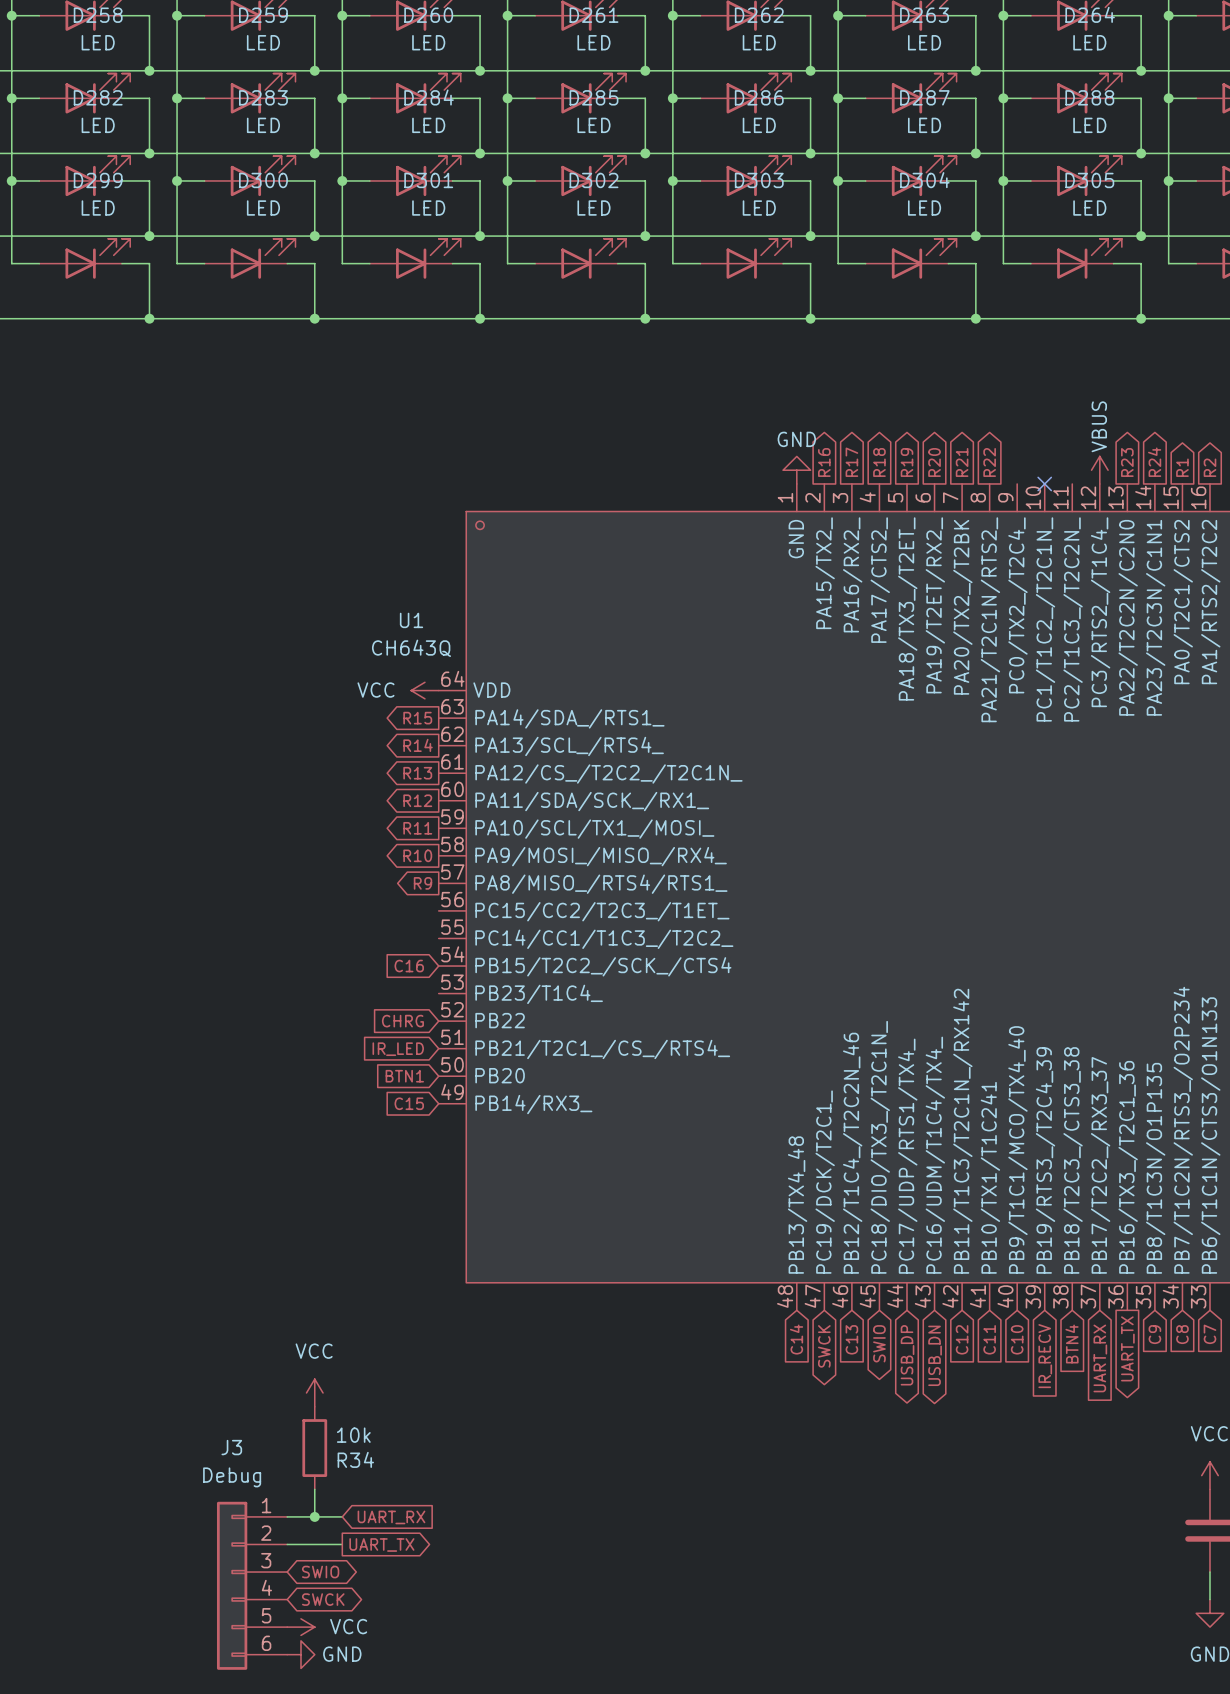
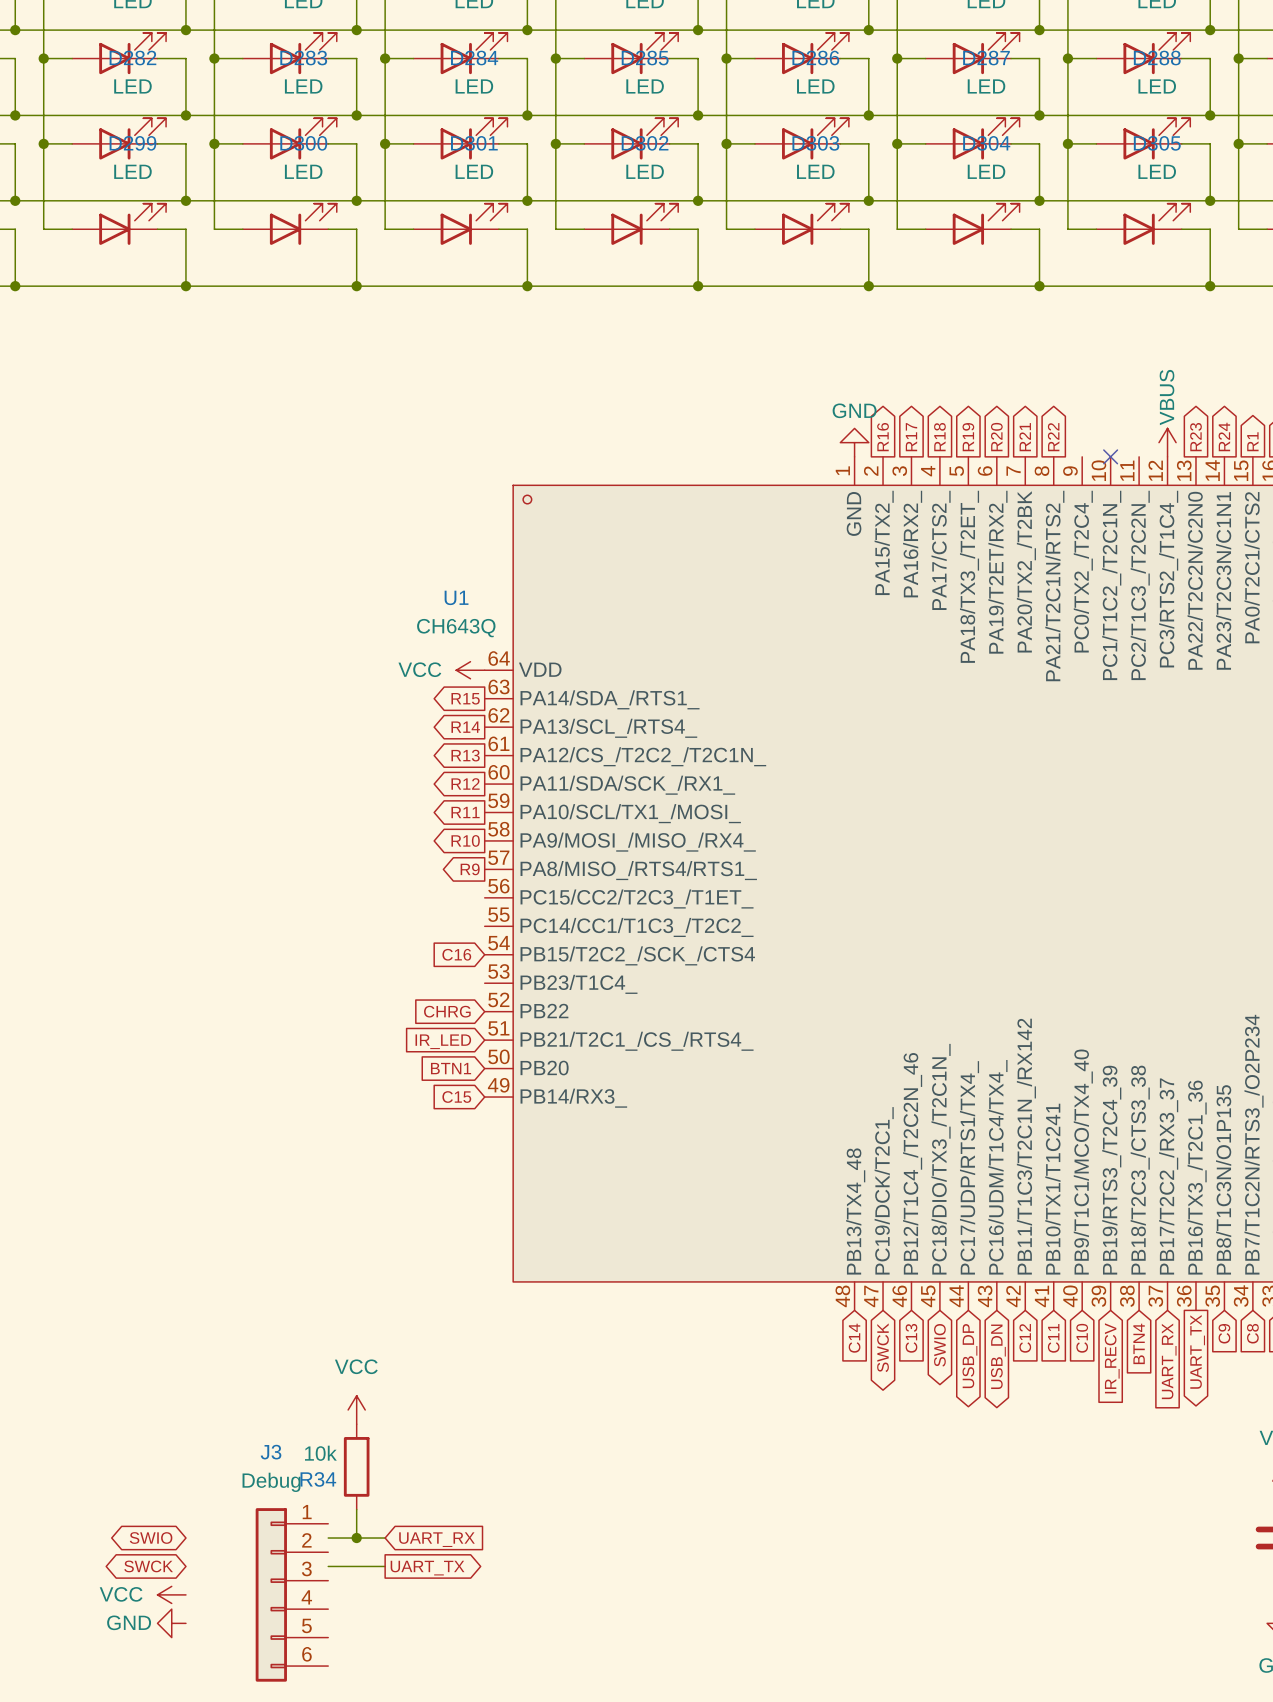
power symbol position: VCC (314, 1392) -> VCC (356, 1409)
R34 value position: 10k (353, 1435) -> 10k (320, 1453)
R34 position: (314, 1448) -> (356, 1466)
R34 name position: R34 (355, 1459) -> R34 (318, 1479)
wire: (287, 1516) (342, 1516) -> (328, 1538) (385, 1538)
junction position: (314, 1516) -> (356, 1538)
global label position: UART_RX (391, 1517) -> UART_RX (437, 1539)
wire: (287, 1544) (342, 1544) -> (328, 1566) (385, 1566)
global label position: UART_TX (381, 1545) -> UART_TX (427, 1568)
global label rotation: 0° (320, 1572) -> 180° (151, 1538)
global label position: SWIO (320, 1572) -> SWIO (151, 1538)
power symbol: none -> VCC (171, 1594)
global label rotation: 0° (323, 1599) -> 180° (148, 1566)
global label position: SWCK (323, 1599) -> SWCK (148, 1566)
power symbol: VCC (300, 1627) -> none
power symbol rotation: 0° (300, 1654) -> 180° (171, 1623)
power symbol position: GND (300, 1654) -> GND (171, 1623)

